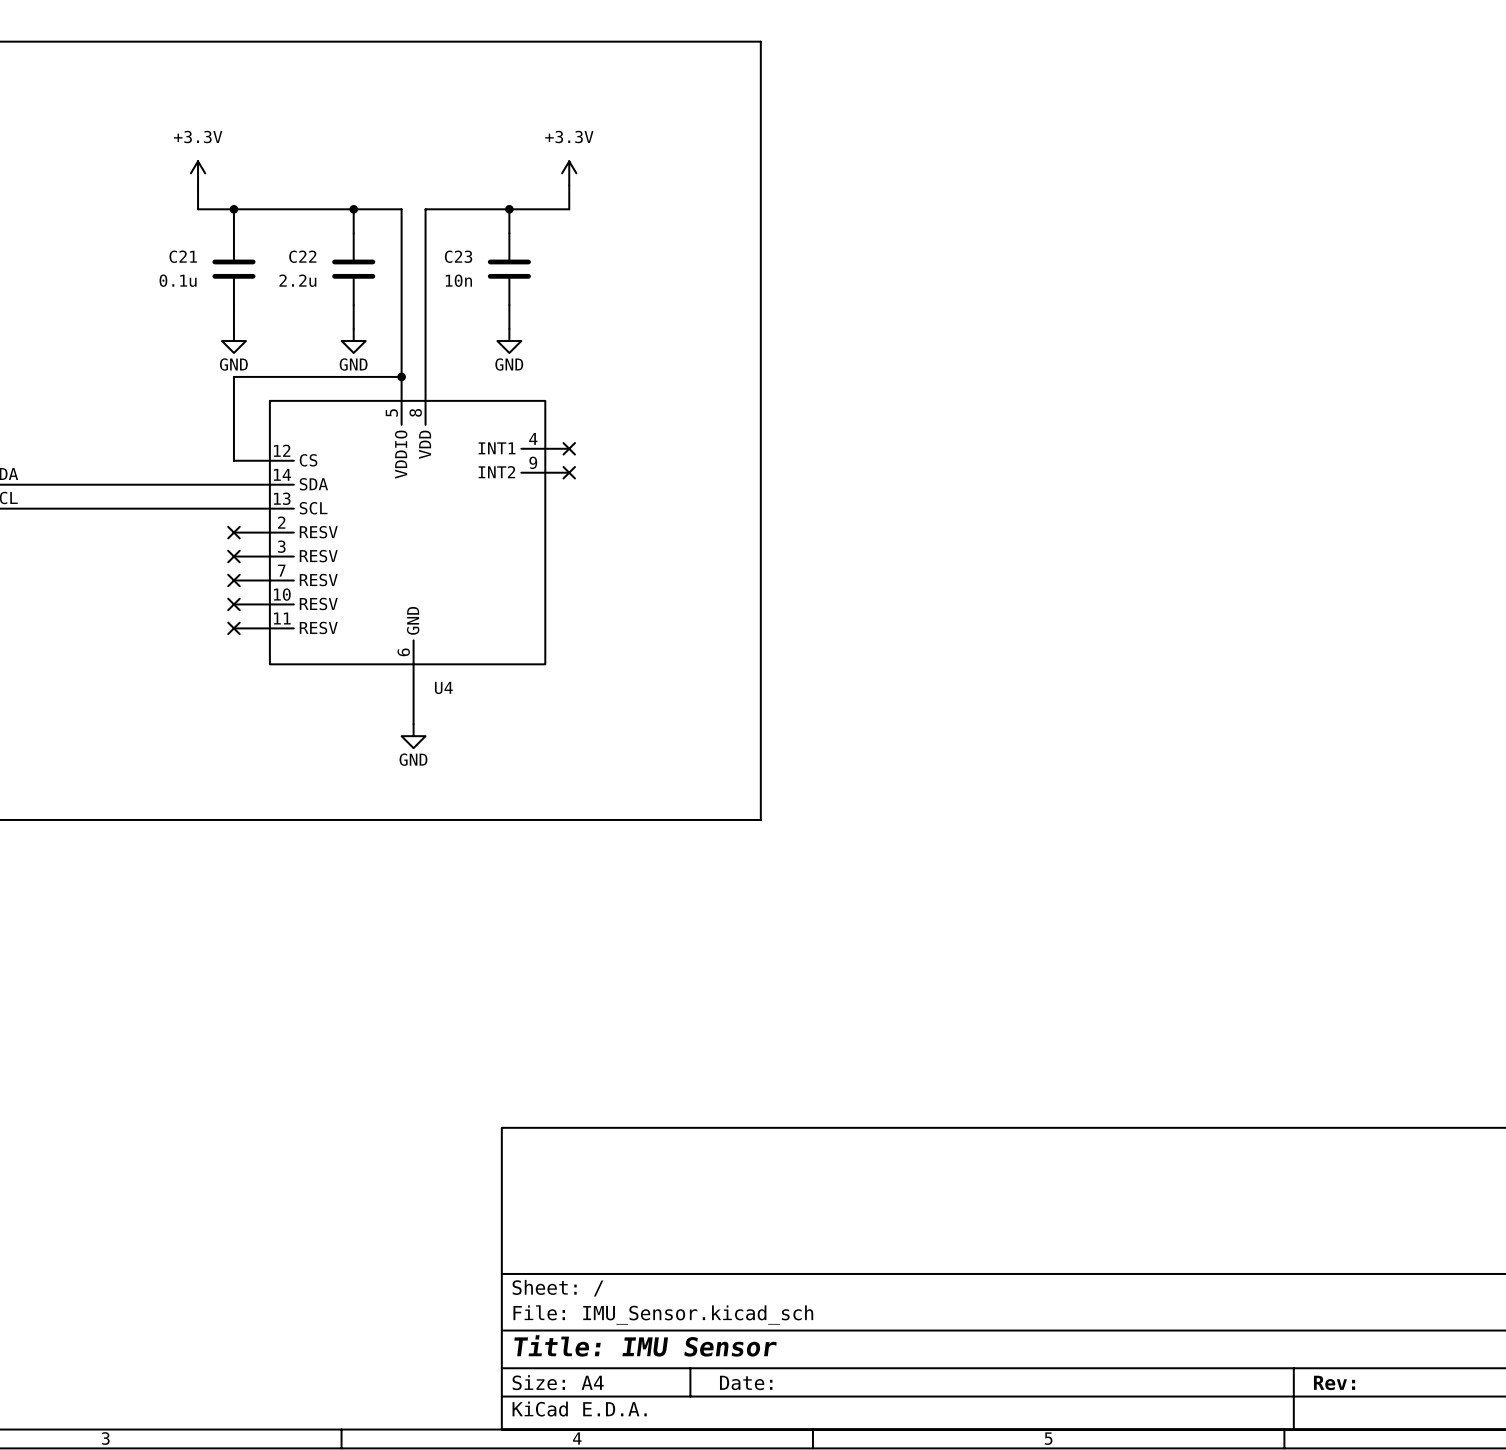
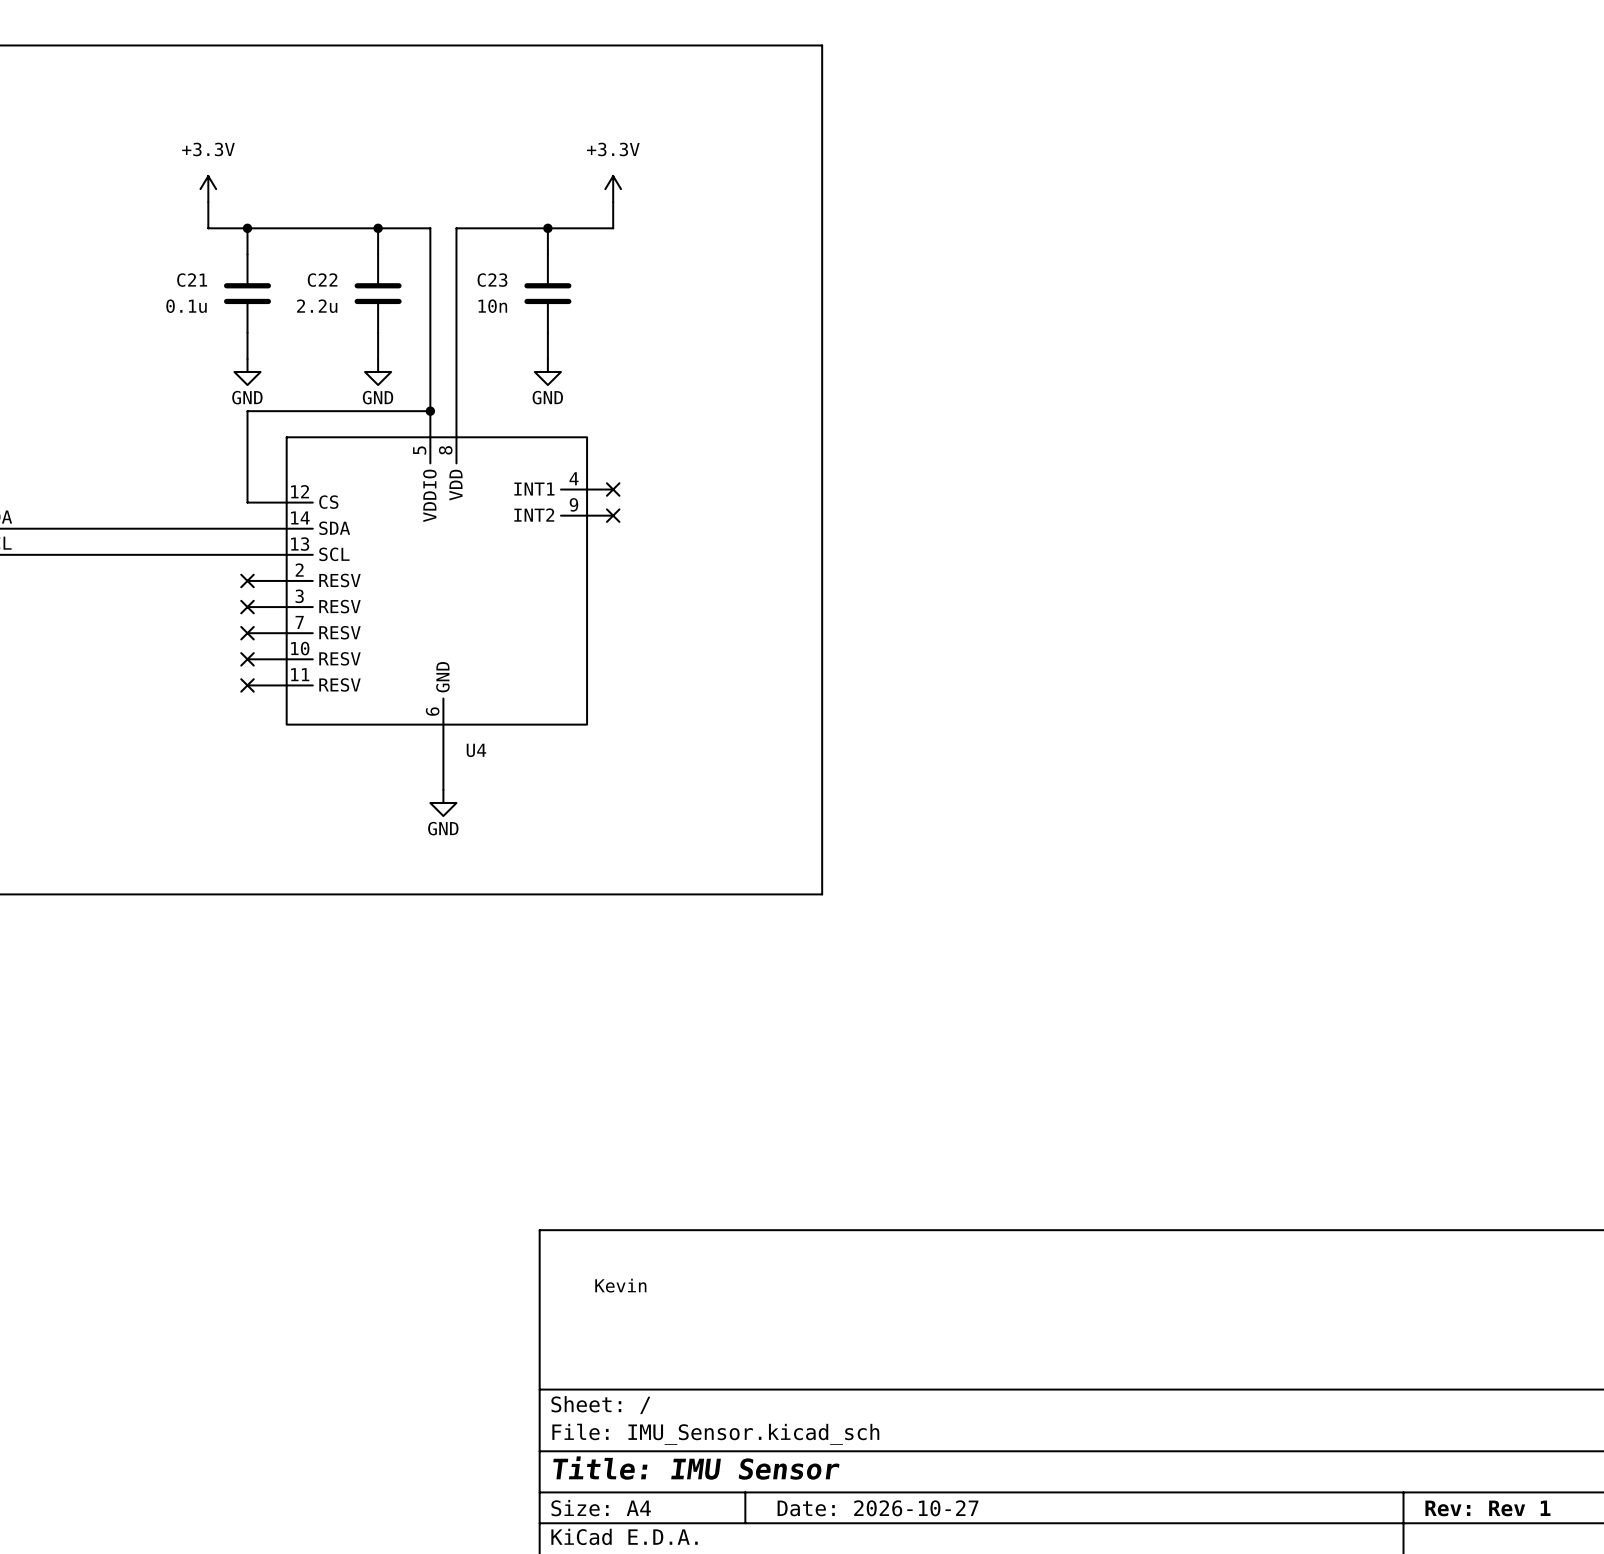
text: none -> Kevin (620, 1285)
title block: Date: (746, 1382) -> Date: 2026-10-27 (878, 1508)
title block: Rev: (1334, 1382) -> Rev: Rev 1 (1487, 1508)

